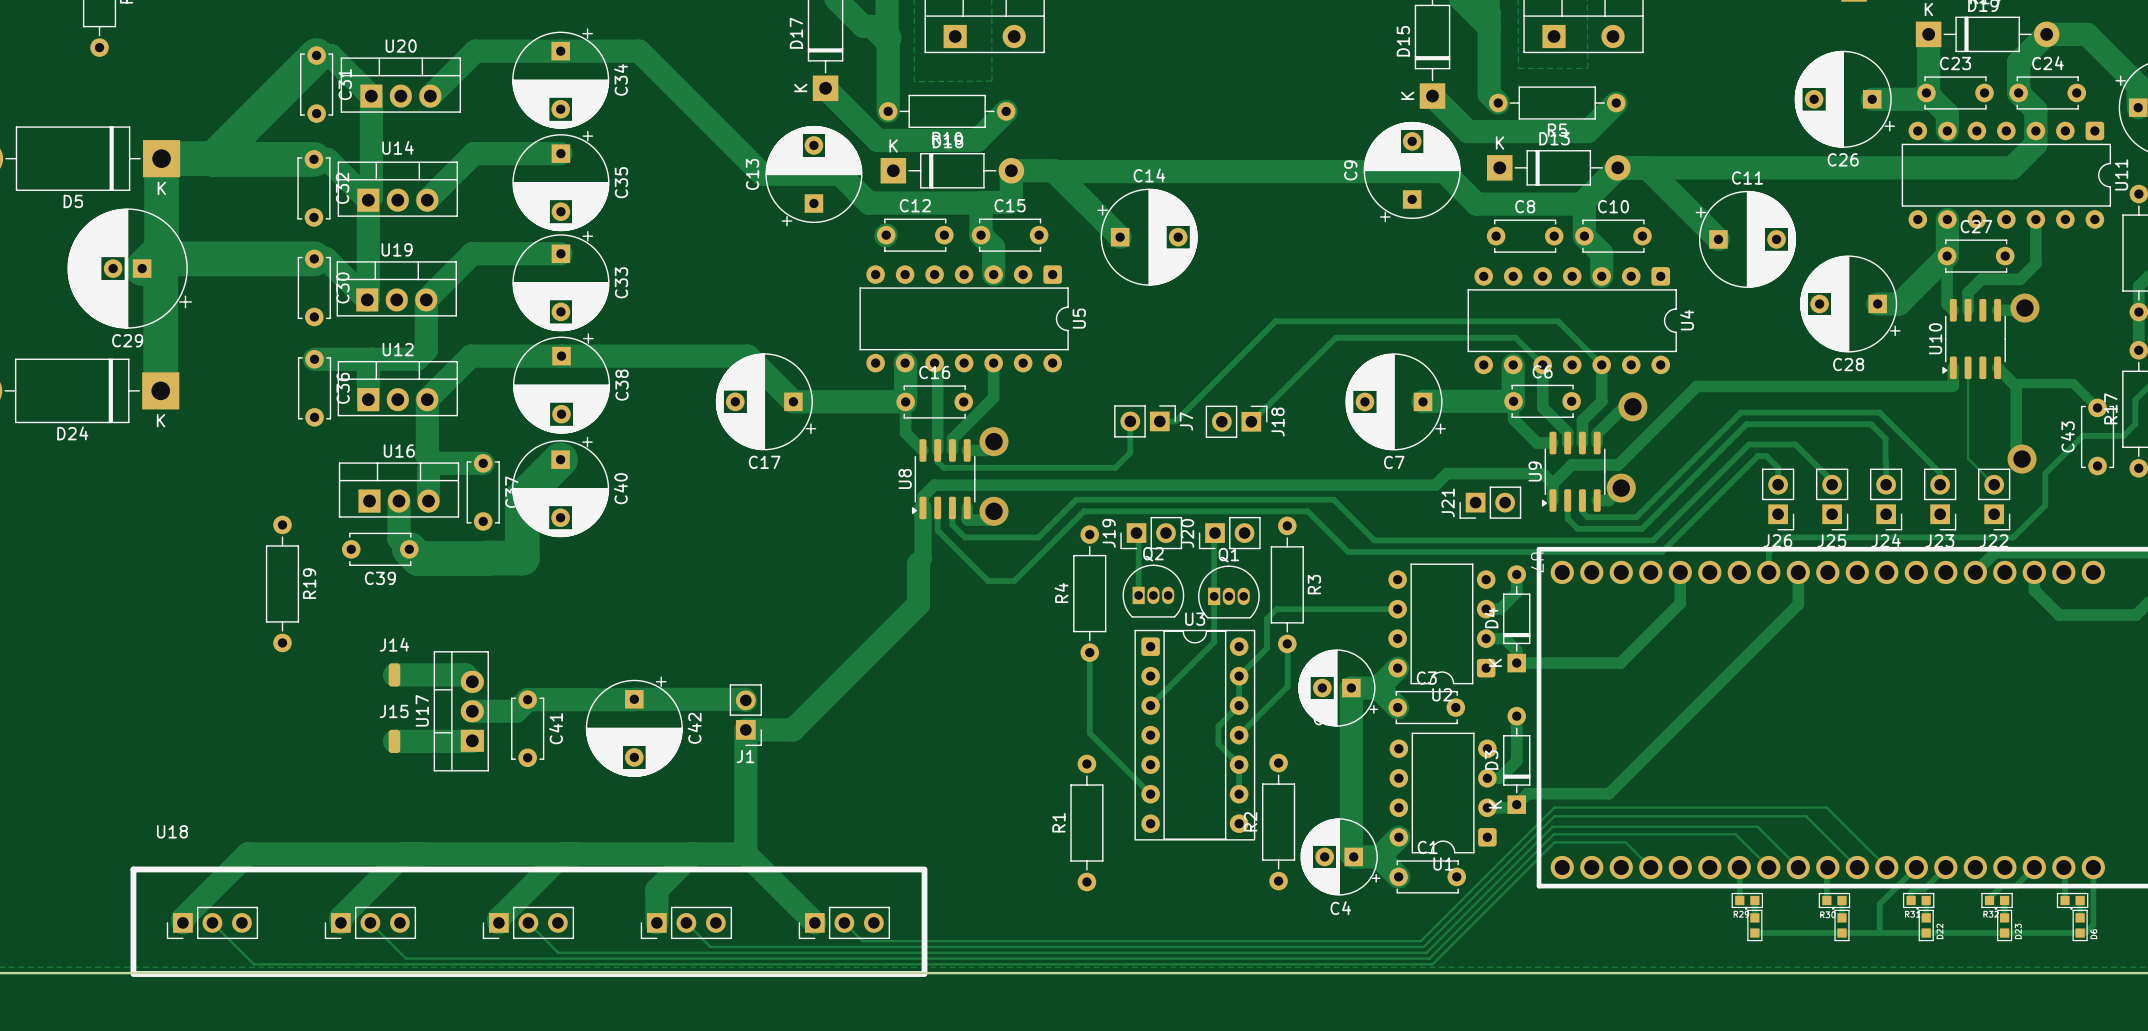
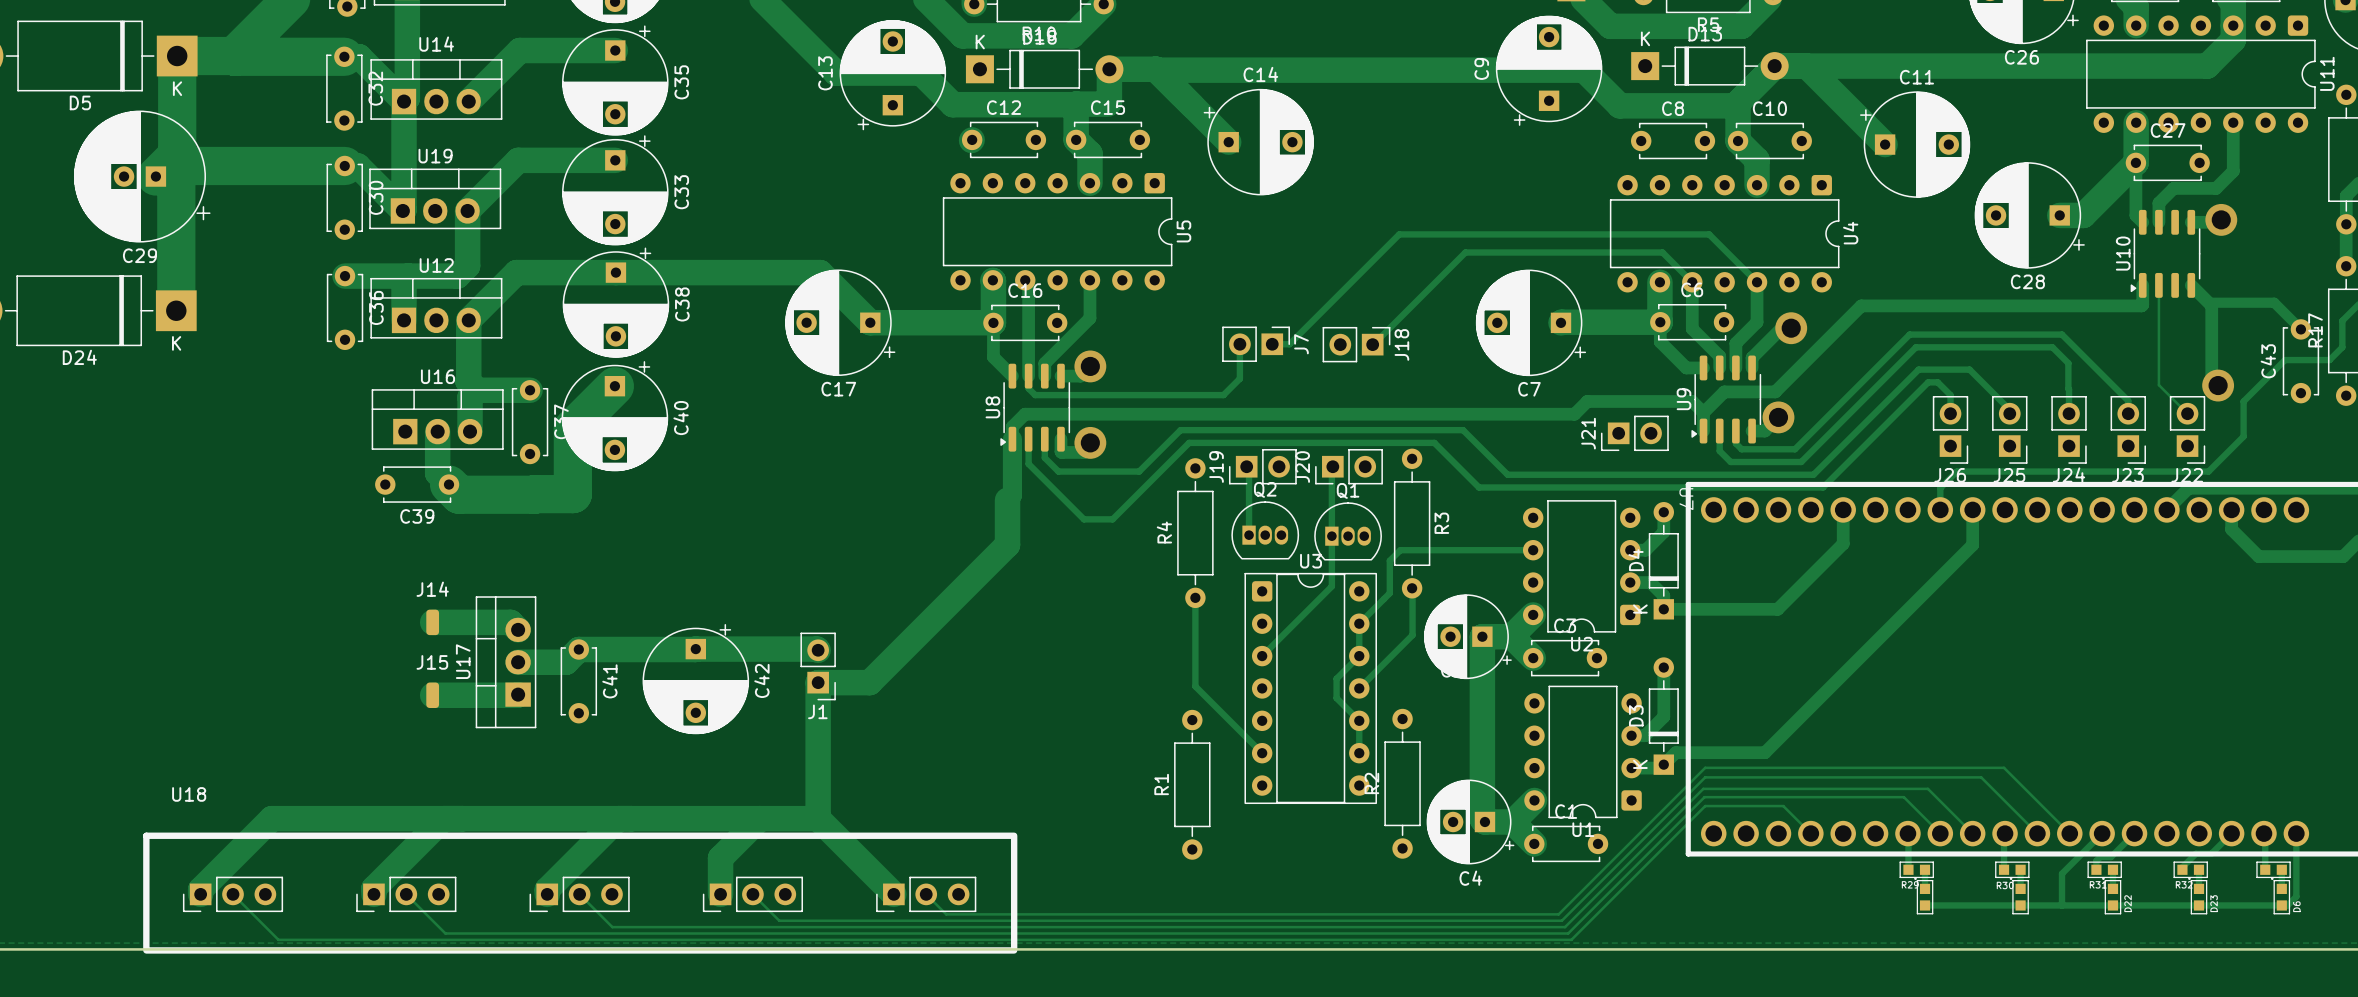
R19: (282, 583) -> none

